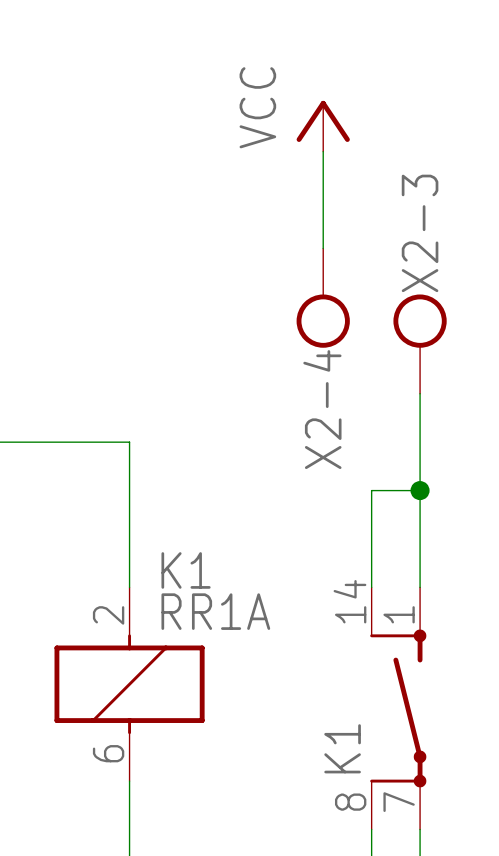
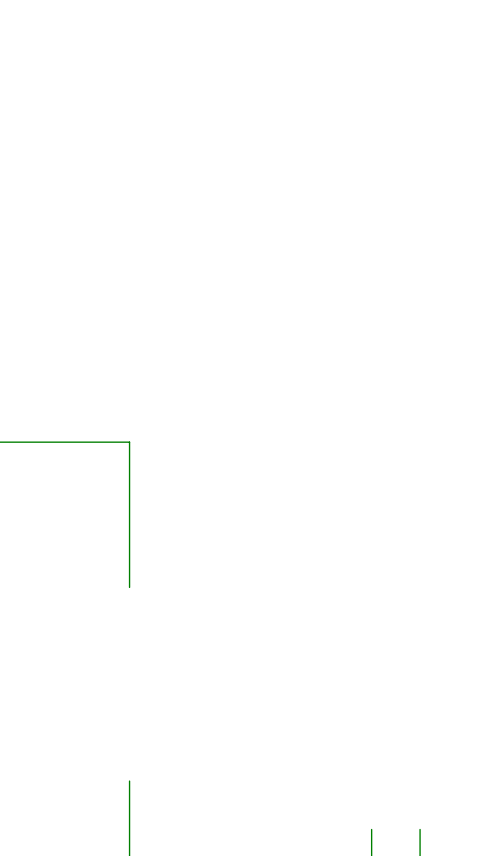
power symbol: VCC (323, 126) -> none
wire: (323, 151) (323, 248) -> none
X2-4: (323, 298) -> none
X2-3: (420, 344) -> none
wire: (420, 393) (420, 587) -> none
wire: (420, 490) (371, 490) (371, 587) -> none
junction: (420, 490) -> none
K1: RR1A (129, 684) -> none
K1: (398, 708) -> none

